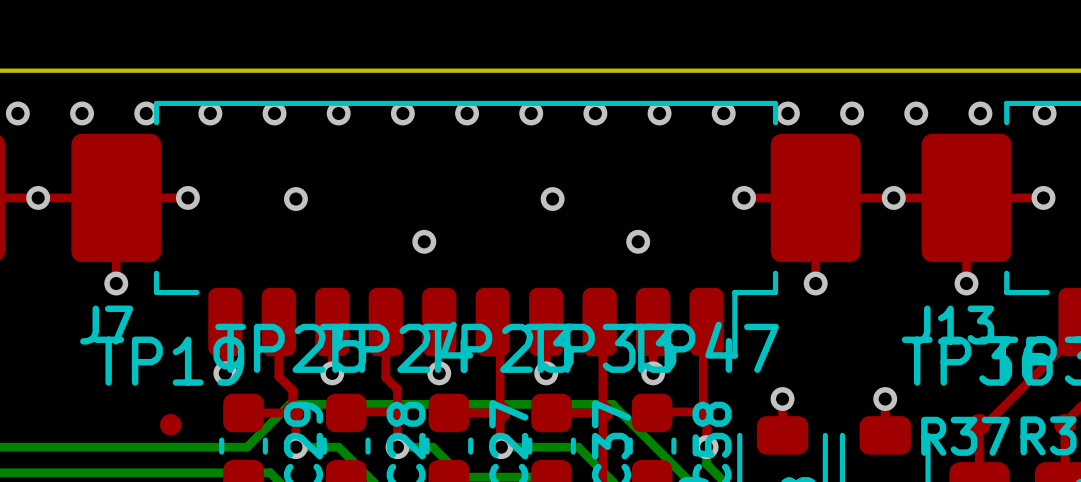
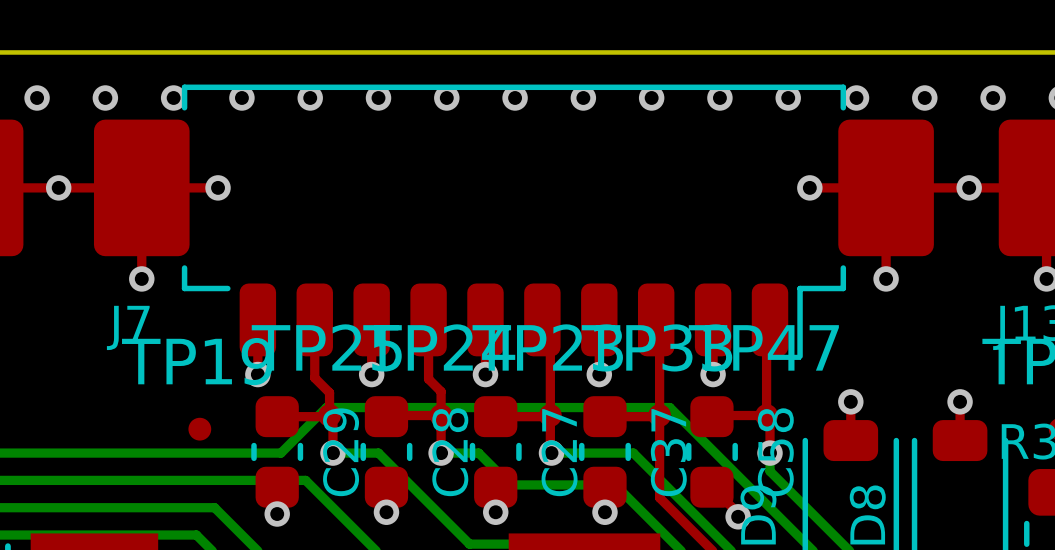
via: (295, 199) -> none
via: (552, 199) -> none
via: (424, 241) -> none
via: (638, 241) -> none

